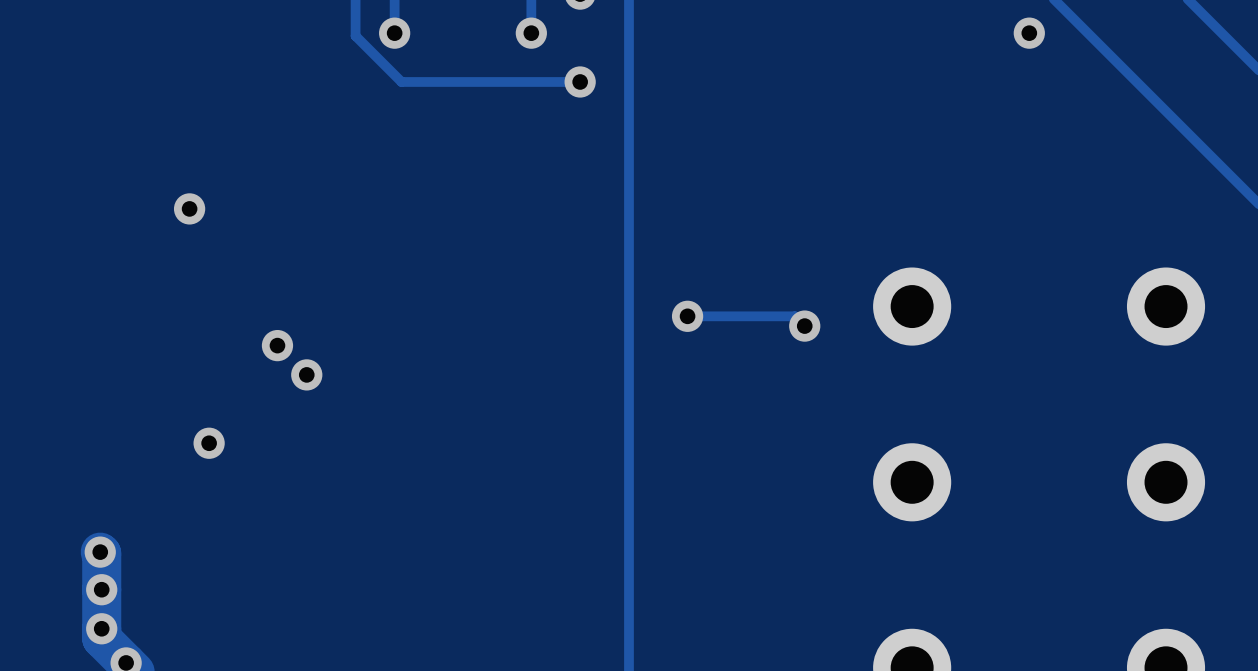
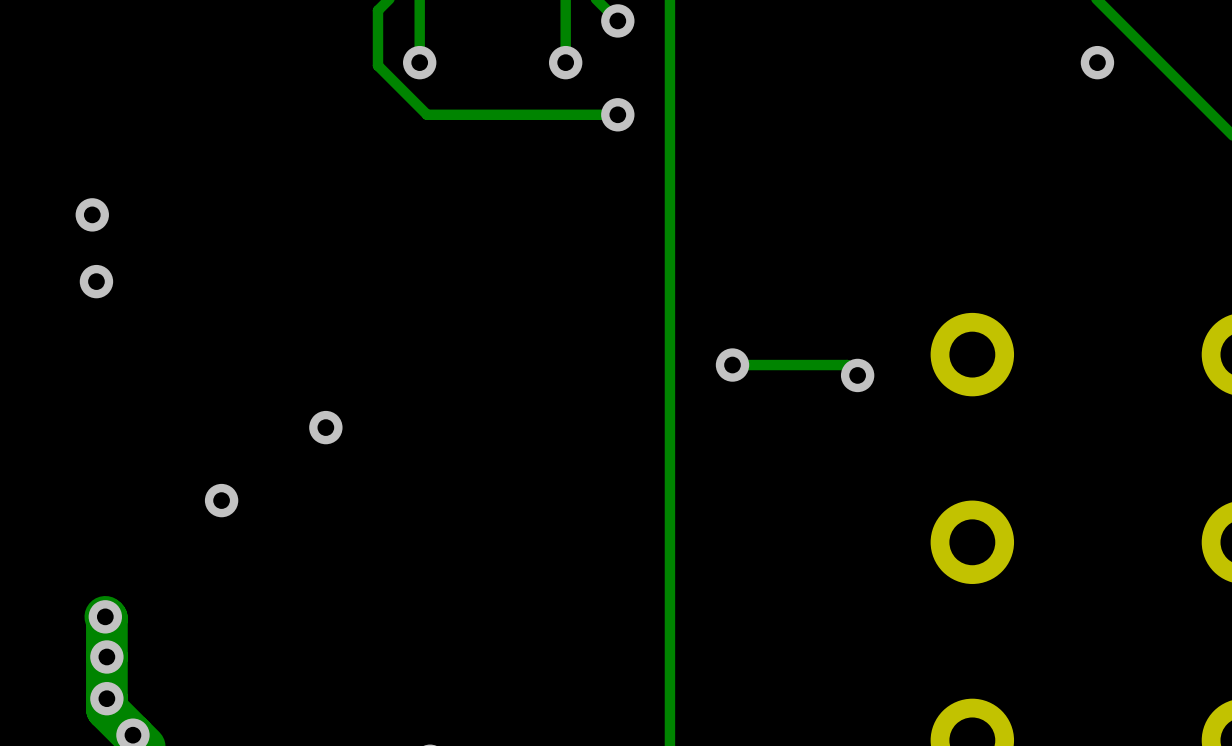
via: none -> (92, 214)
via: (189, 208) -> none
via: none -> (96, 281)
via: (277, 345) -> none

